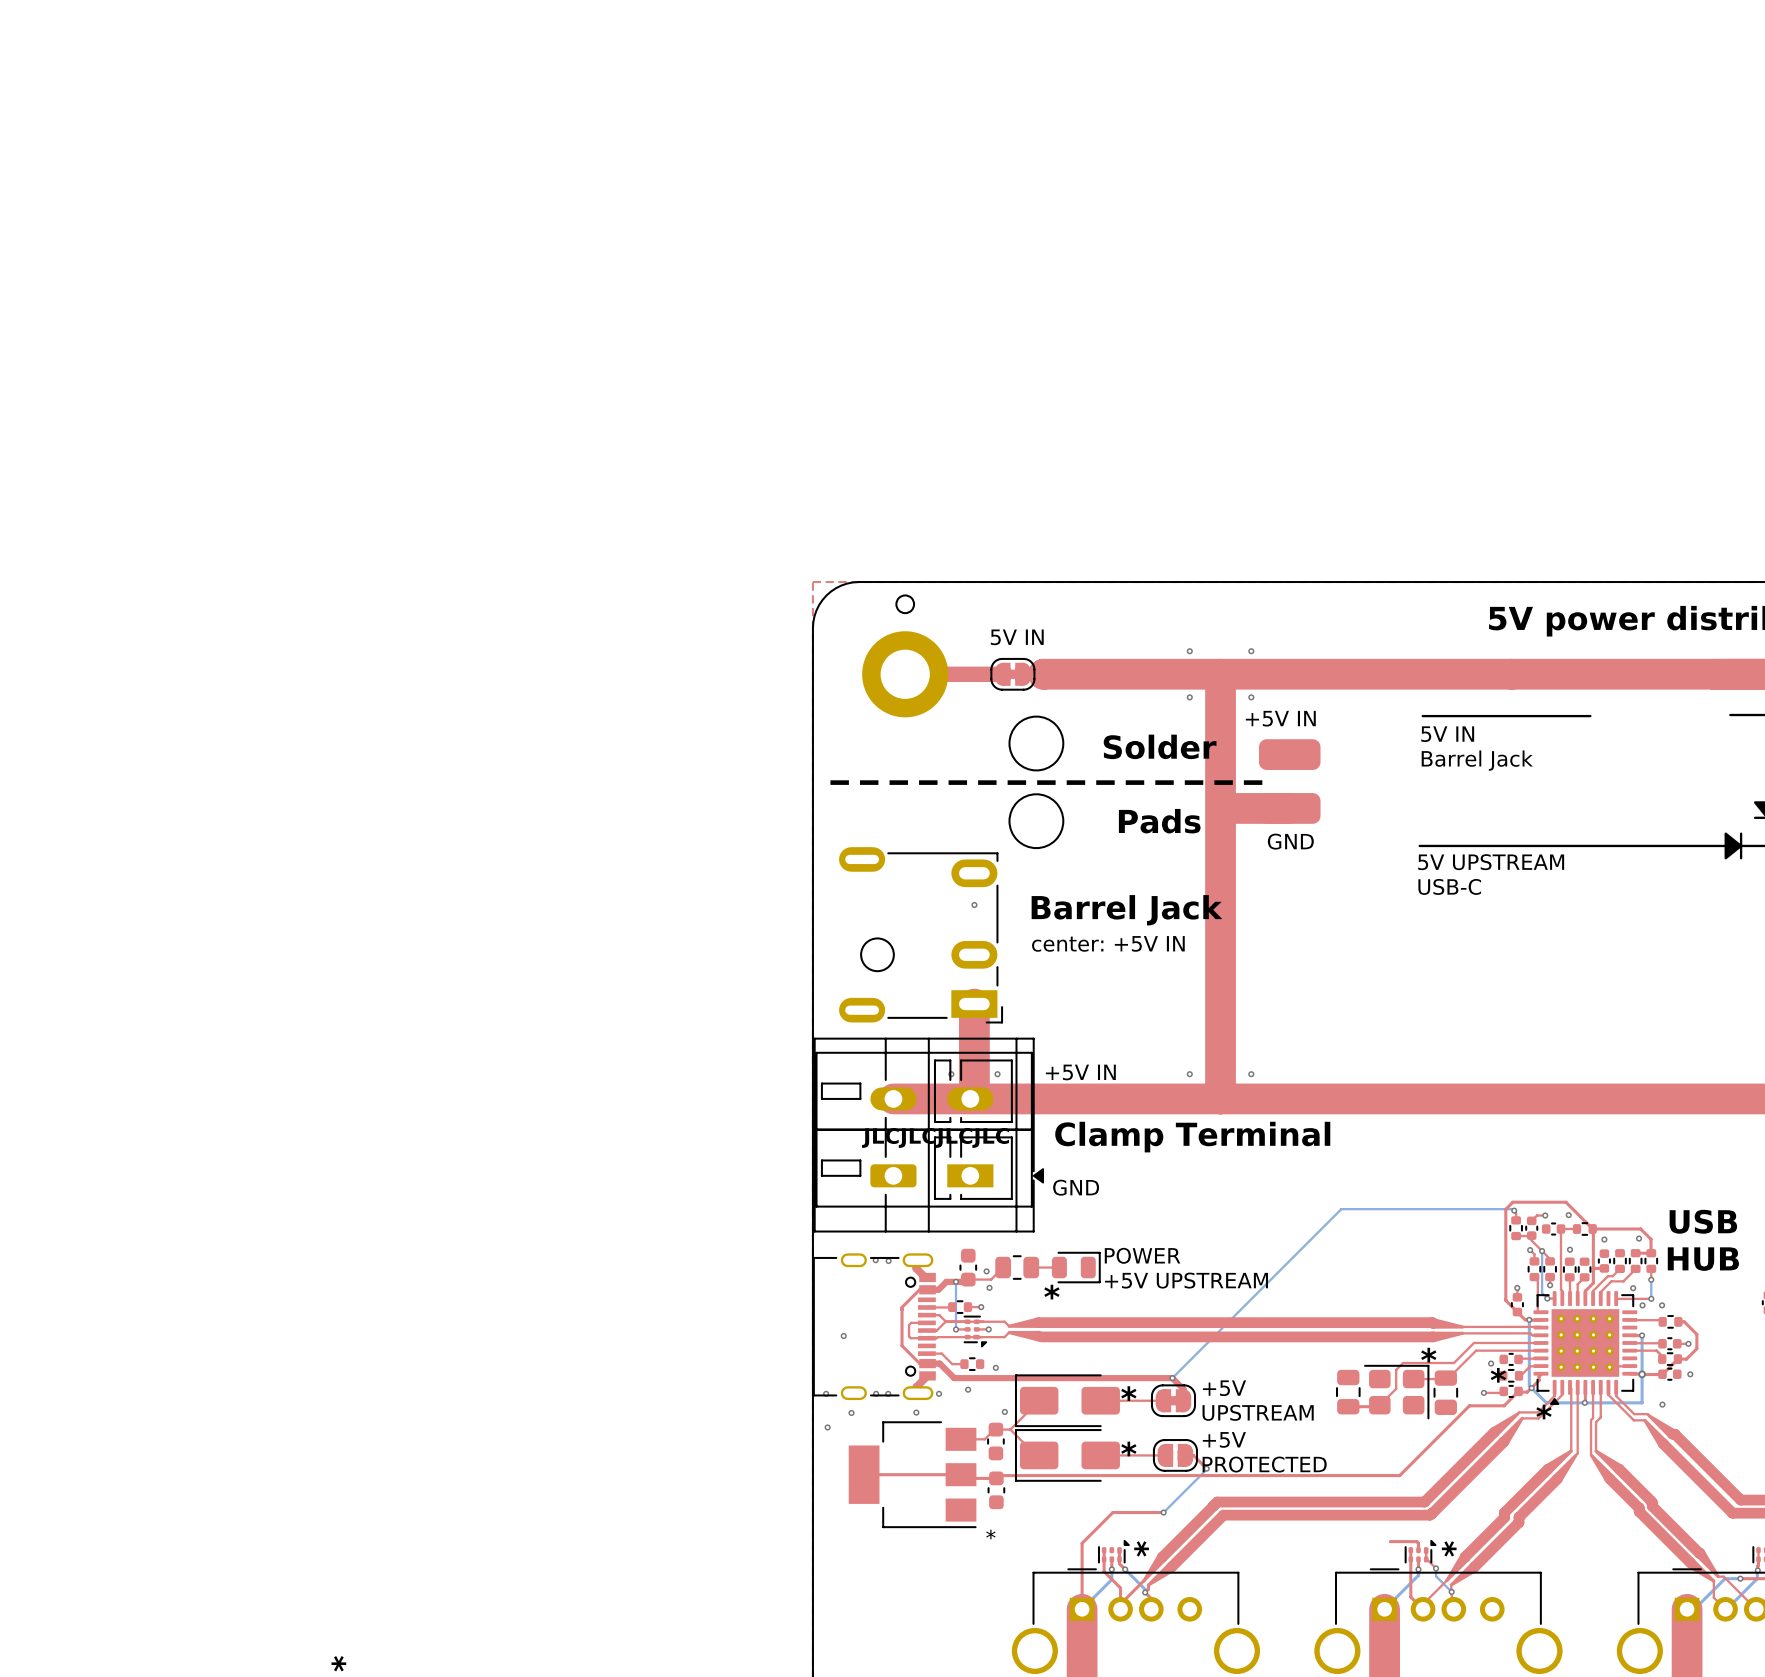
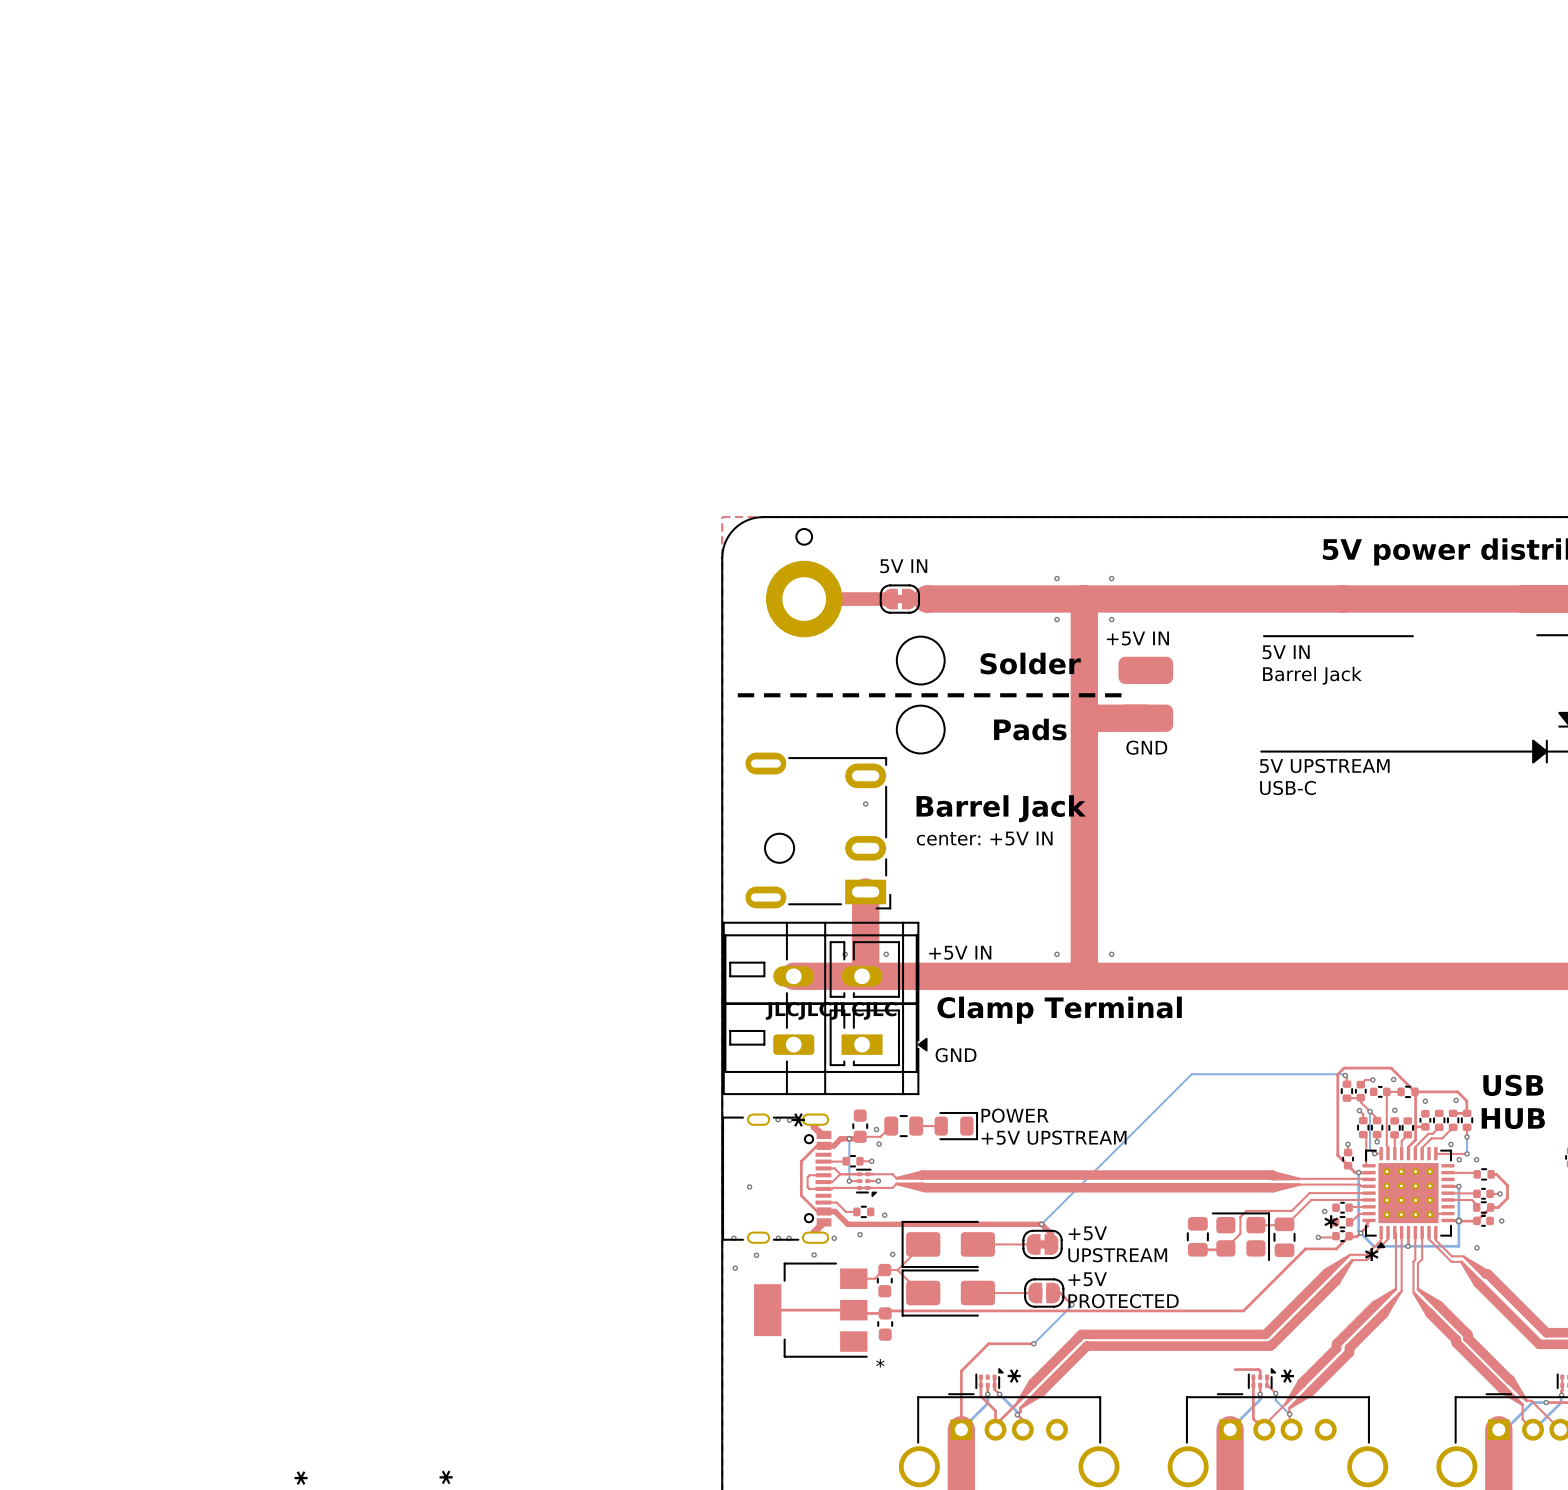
text: none -> * (798, 1119)
text: * (1051, 1292) -> none
text: * (1428, 1355) -> none
text: * (1128, 1393) -> none
text: * (1128, 1448) -> none
text: none -> * (446, 1477)

